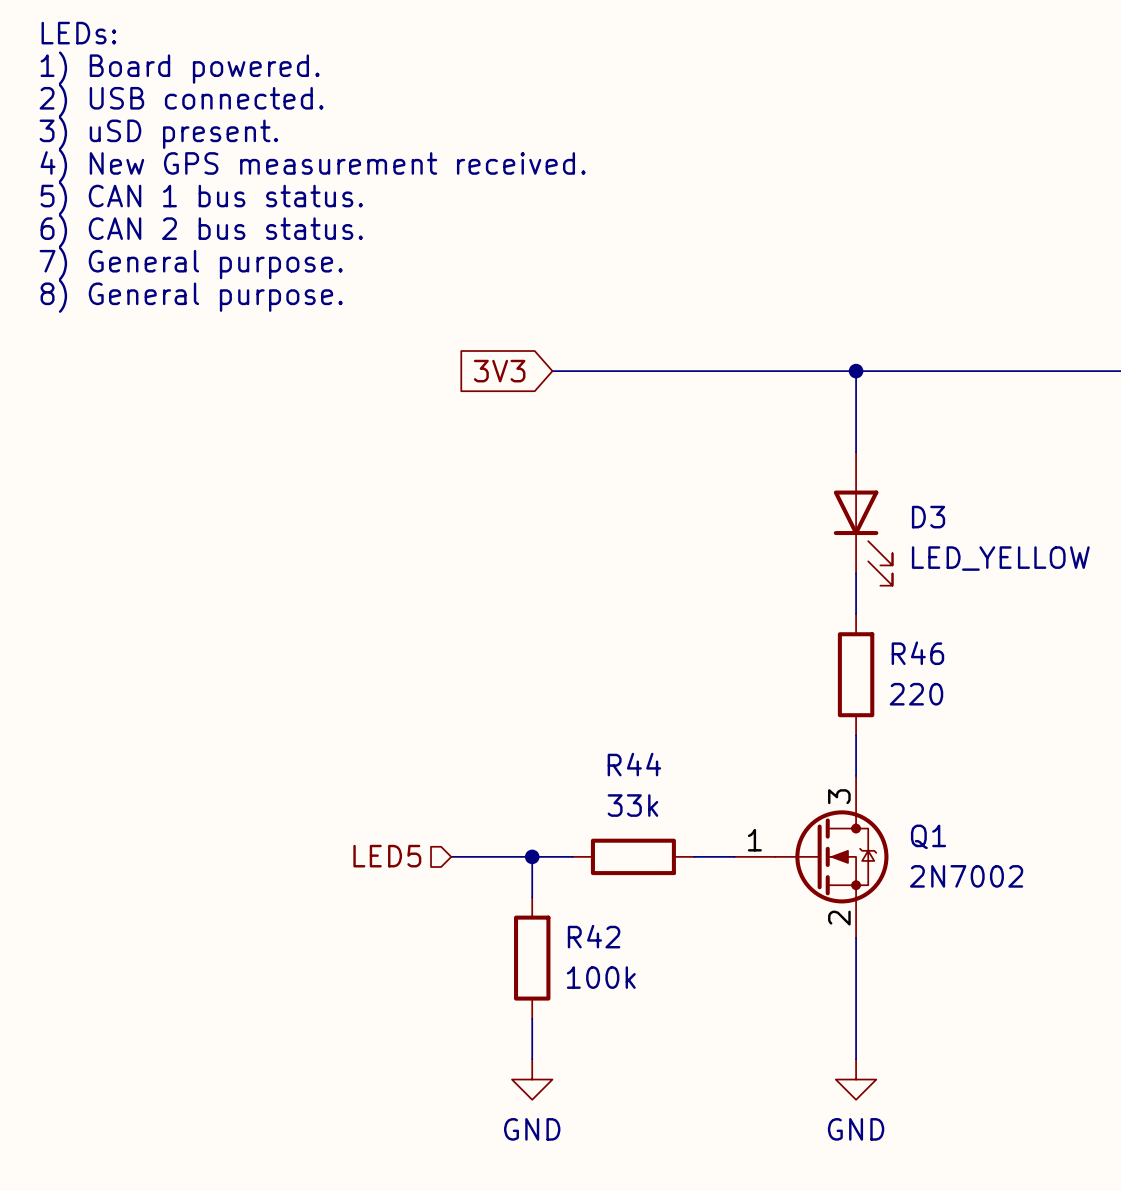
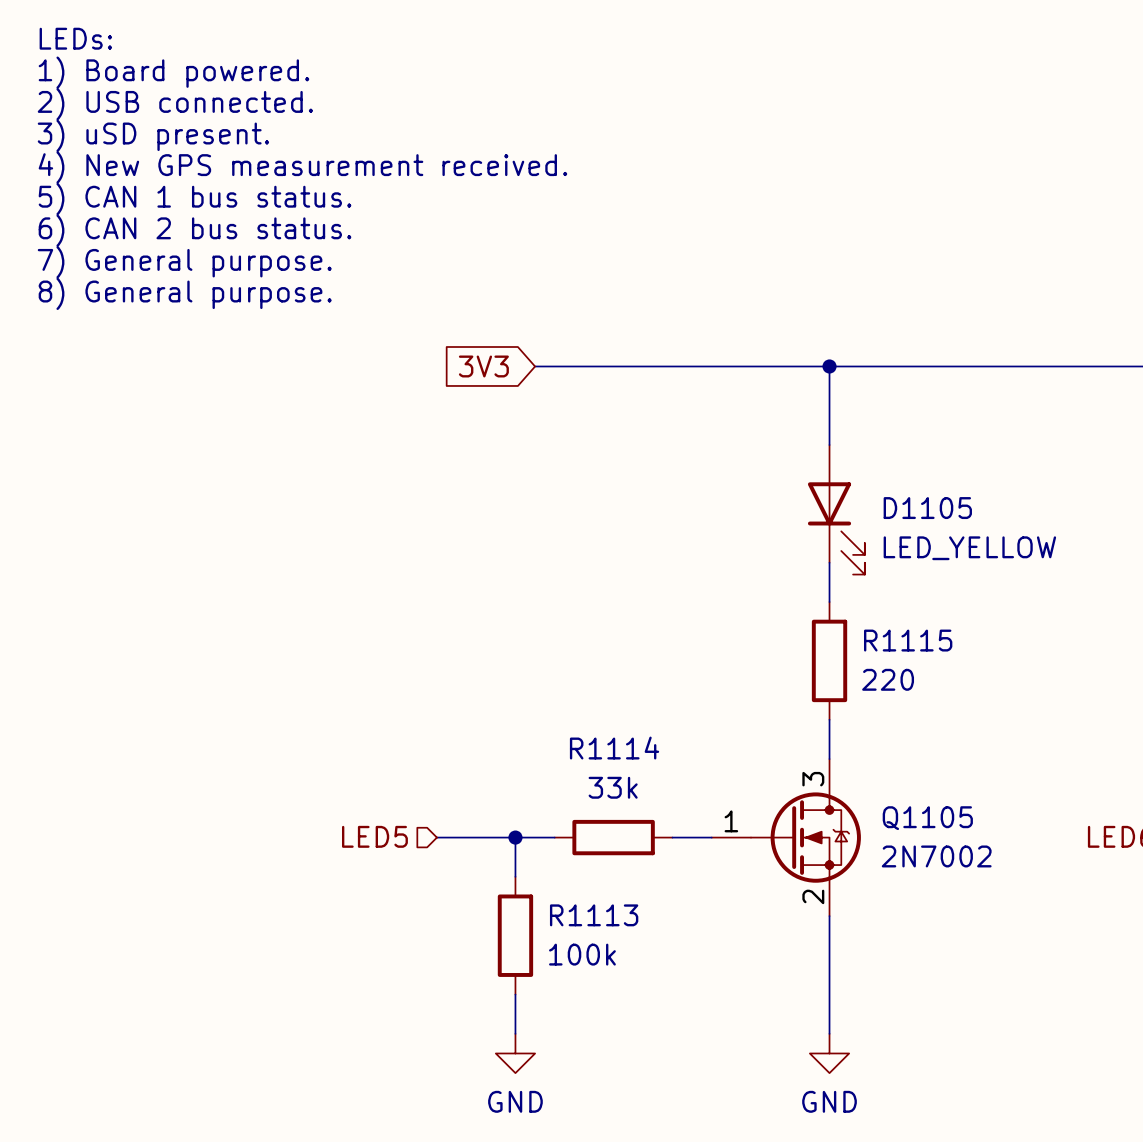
D3 name: D3 (928, 517) -> D1105 (927, 508)
R46 name: R46 (917, 653) -> R1115 (908, 640)
R44 name: R44 (634, 764) -> R1114 (614, 748)
Q1 name: Q1 (928, 836) -> Q1105 (927, 818)
R42 name: R42 (594, 936) -> R1113 (594, 915)

